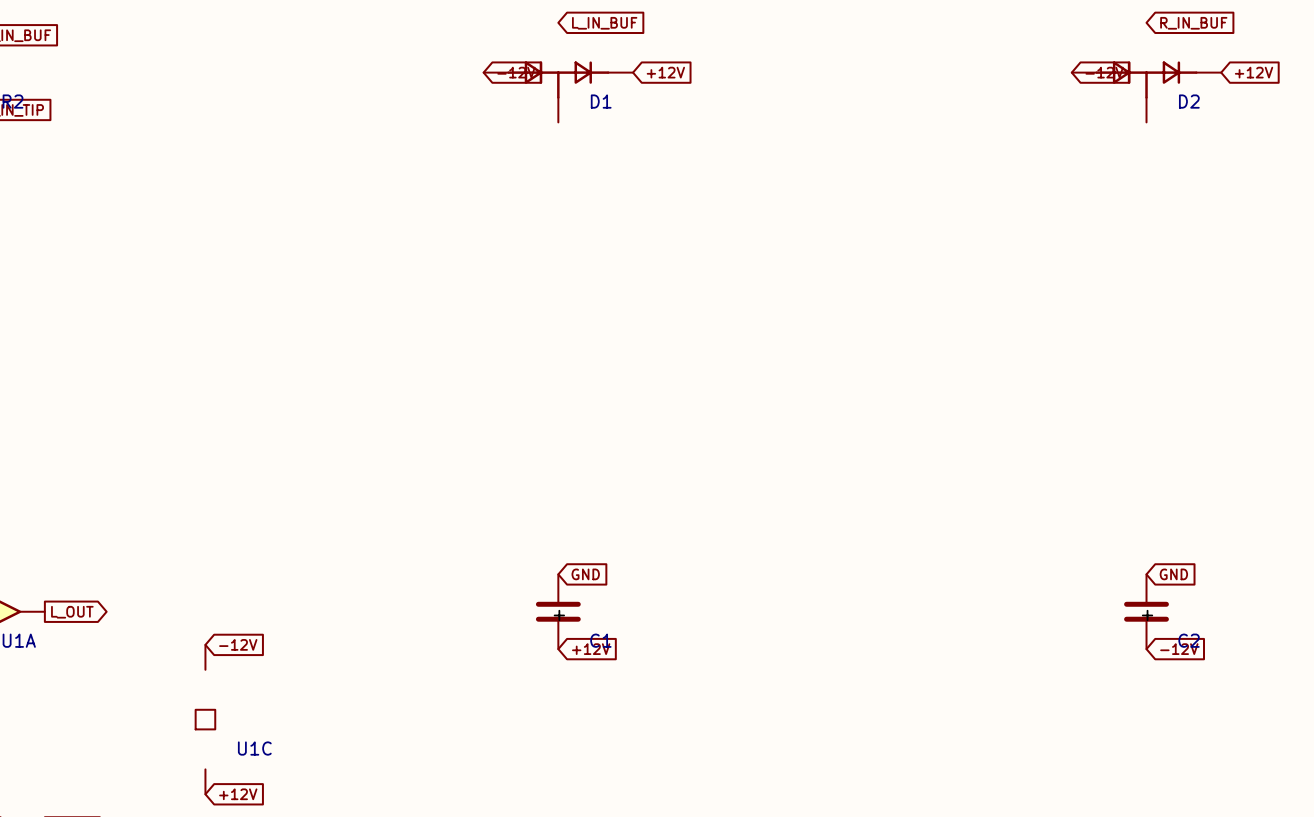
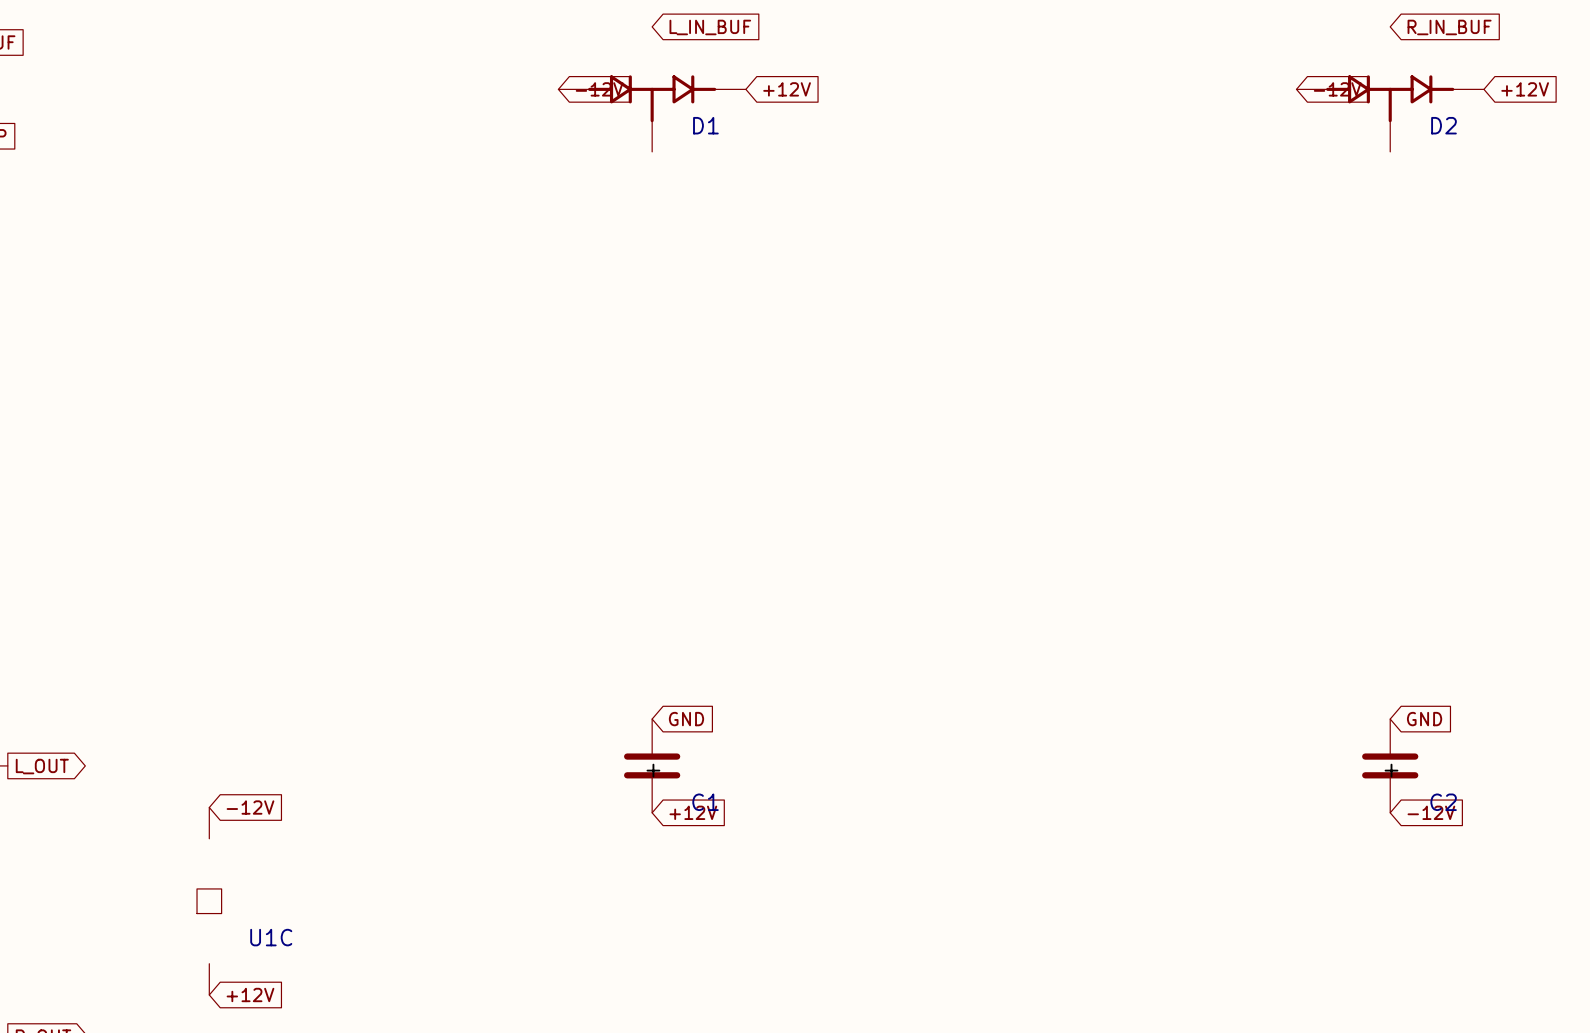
D1 symbol: [483, 61, 634, 123] -> [558, 75, 746, 152]
D2 symbol: [1071, 61, 1222, 123] -> [1296, 75, 1484, 152]

